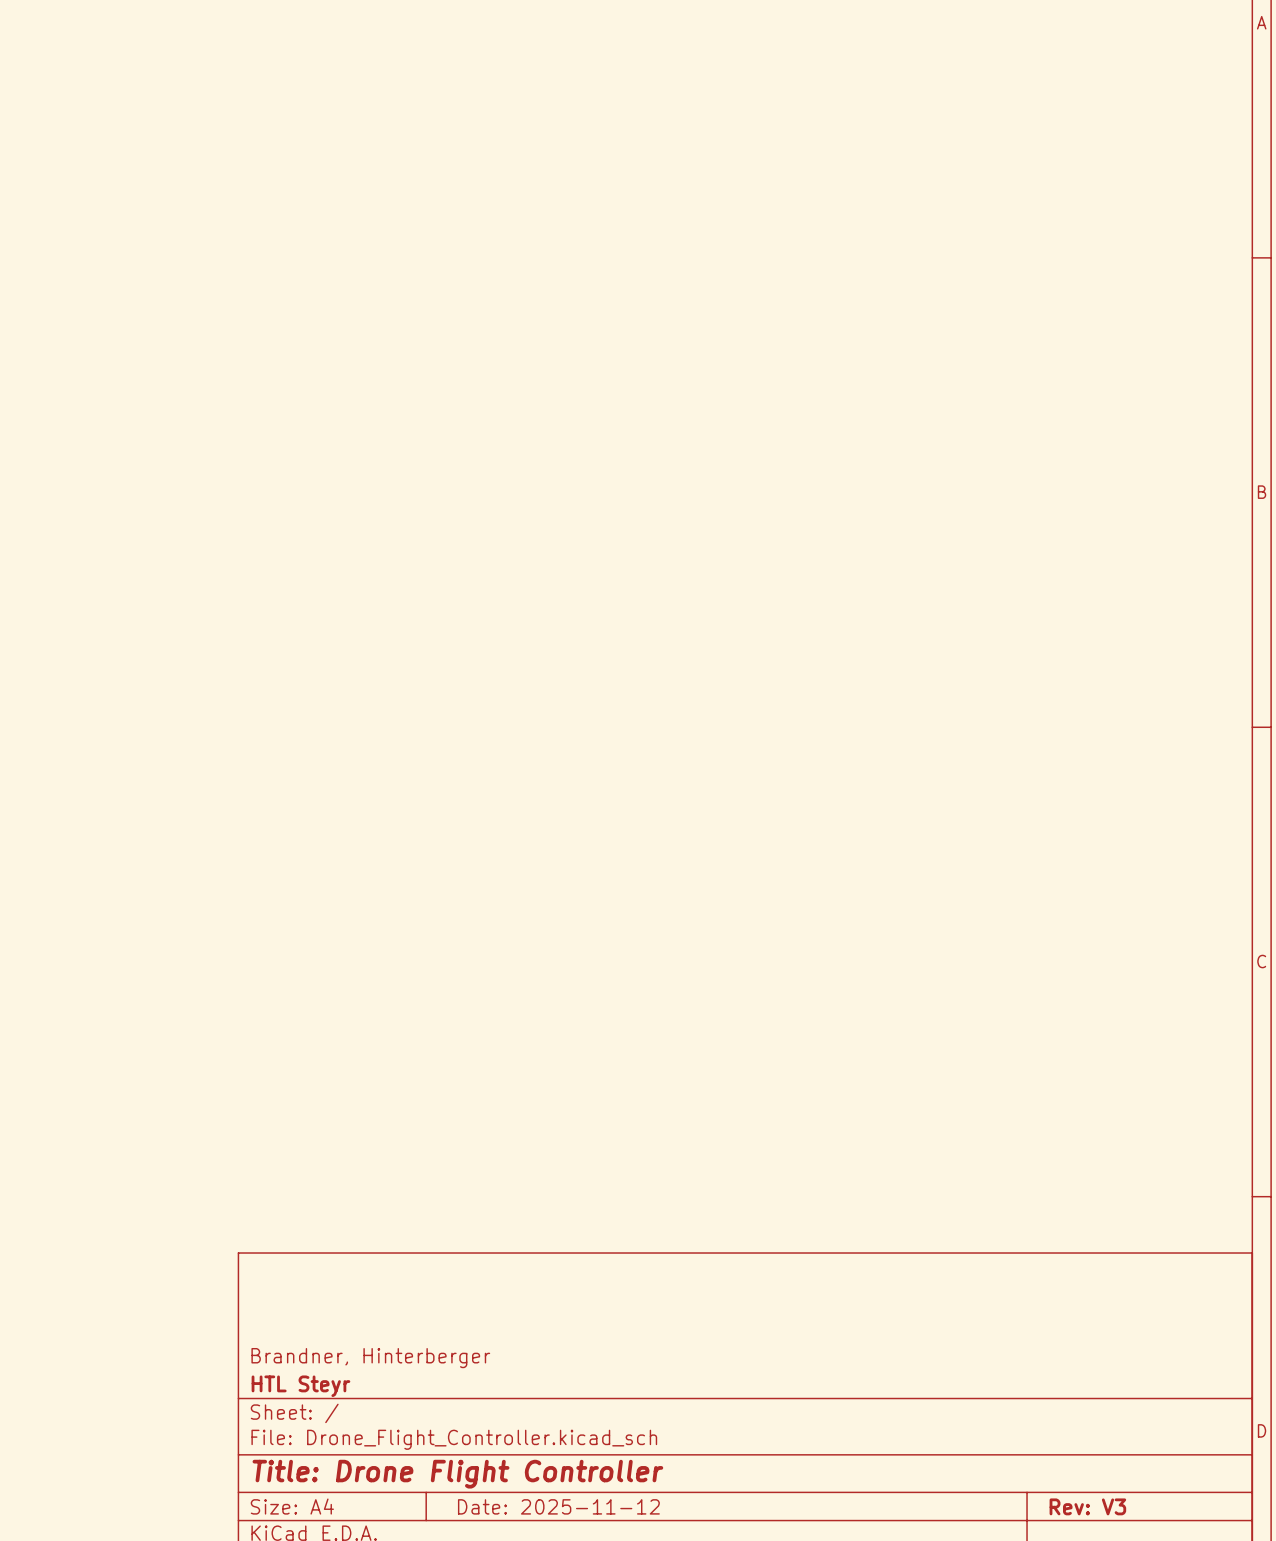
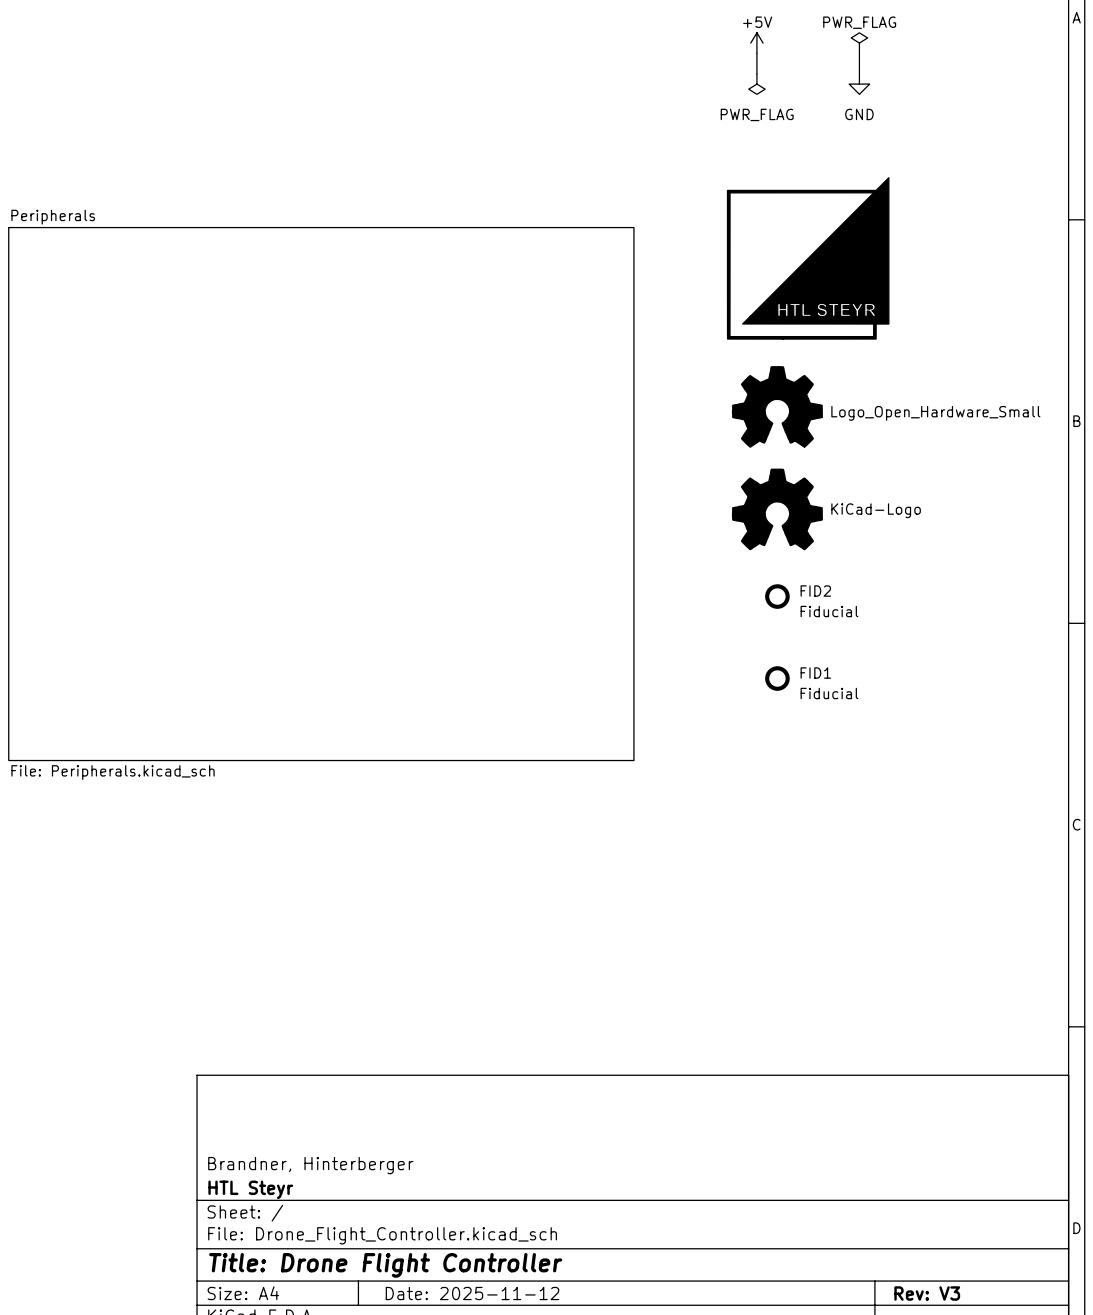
power symbol: none -> +5V (756, 43)
power symbol: none -> PWR_FLAG (859, 43)
wire: none -> (756, 53) (756, 73)
wire: none -> (859, 53) (859, 73)
power symbol: none -> PWR_FLAG (756, 84)
power symbol: none -> GND (859, 84)
part: none -> (808, 258)
part: none -> Logo_Open_Hardware_Small (777, 406)
sheet Peripherals: none -> File: Peripherals.kicad_sch (321, 494)
part: none -> KiCad-Logo (777, 509)
FID2: none -> Fiducial (777, 596)
FID1: none -> Fiducial (777, 678)

